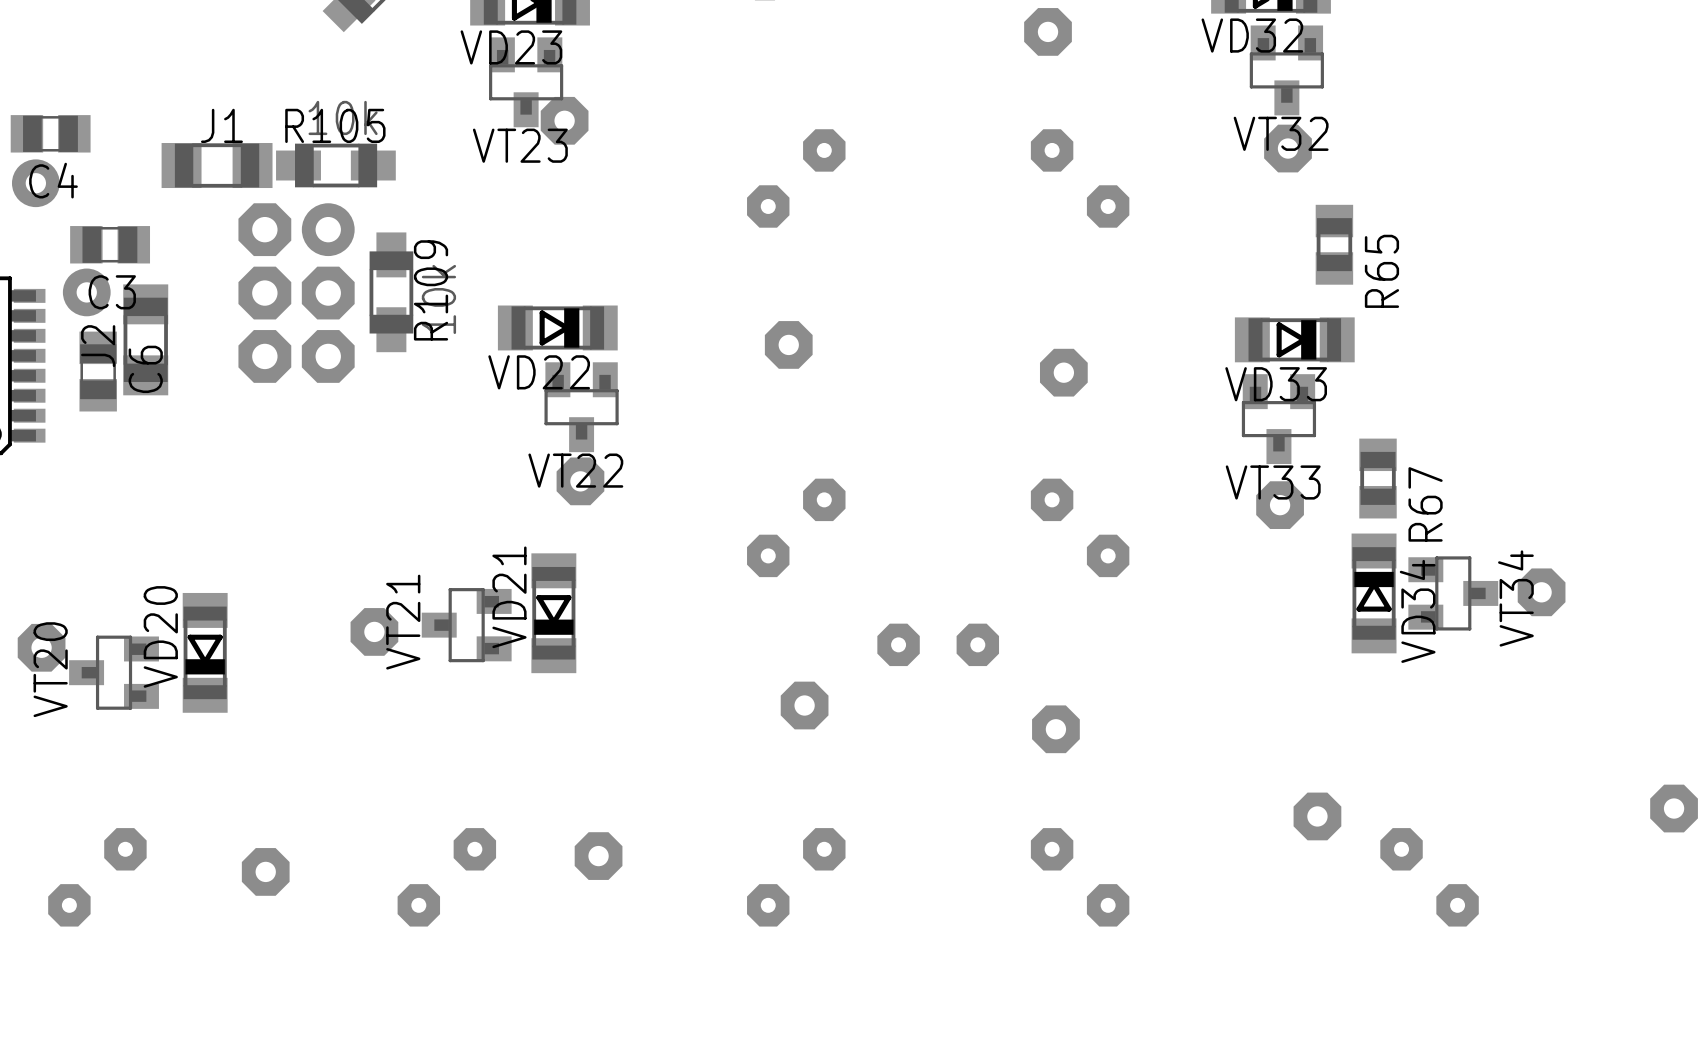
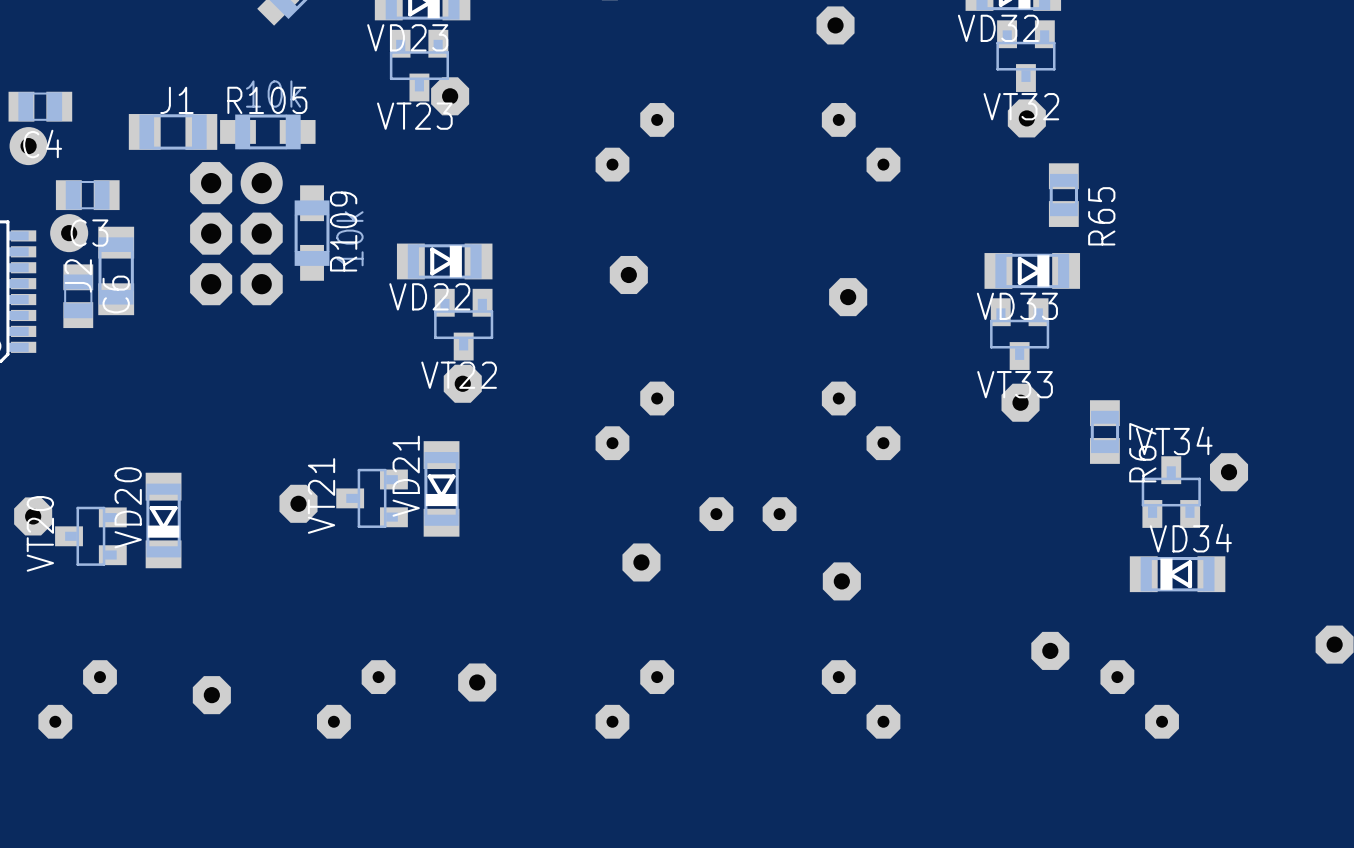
R67 position: (1378, 478) -> (1104, 432)
VD34 rotation: 0° (1374, 593) -> 90° counterclockwise (1177, 574)
VD34 position: (1374, 593) -> (1177, 574)
VT34 rotation: 0° (1453, 593) -> 90° counterclockwise (1171, 492)

